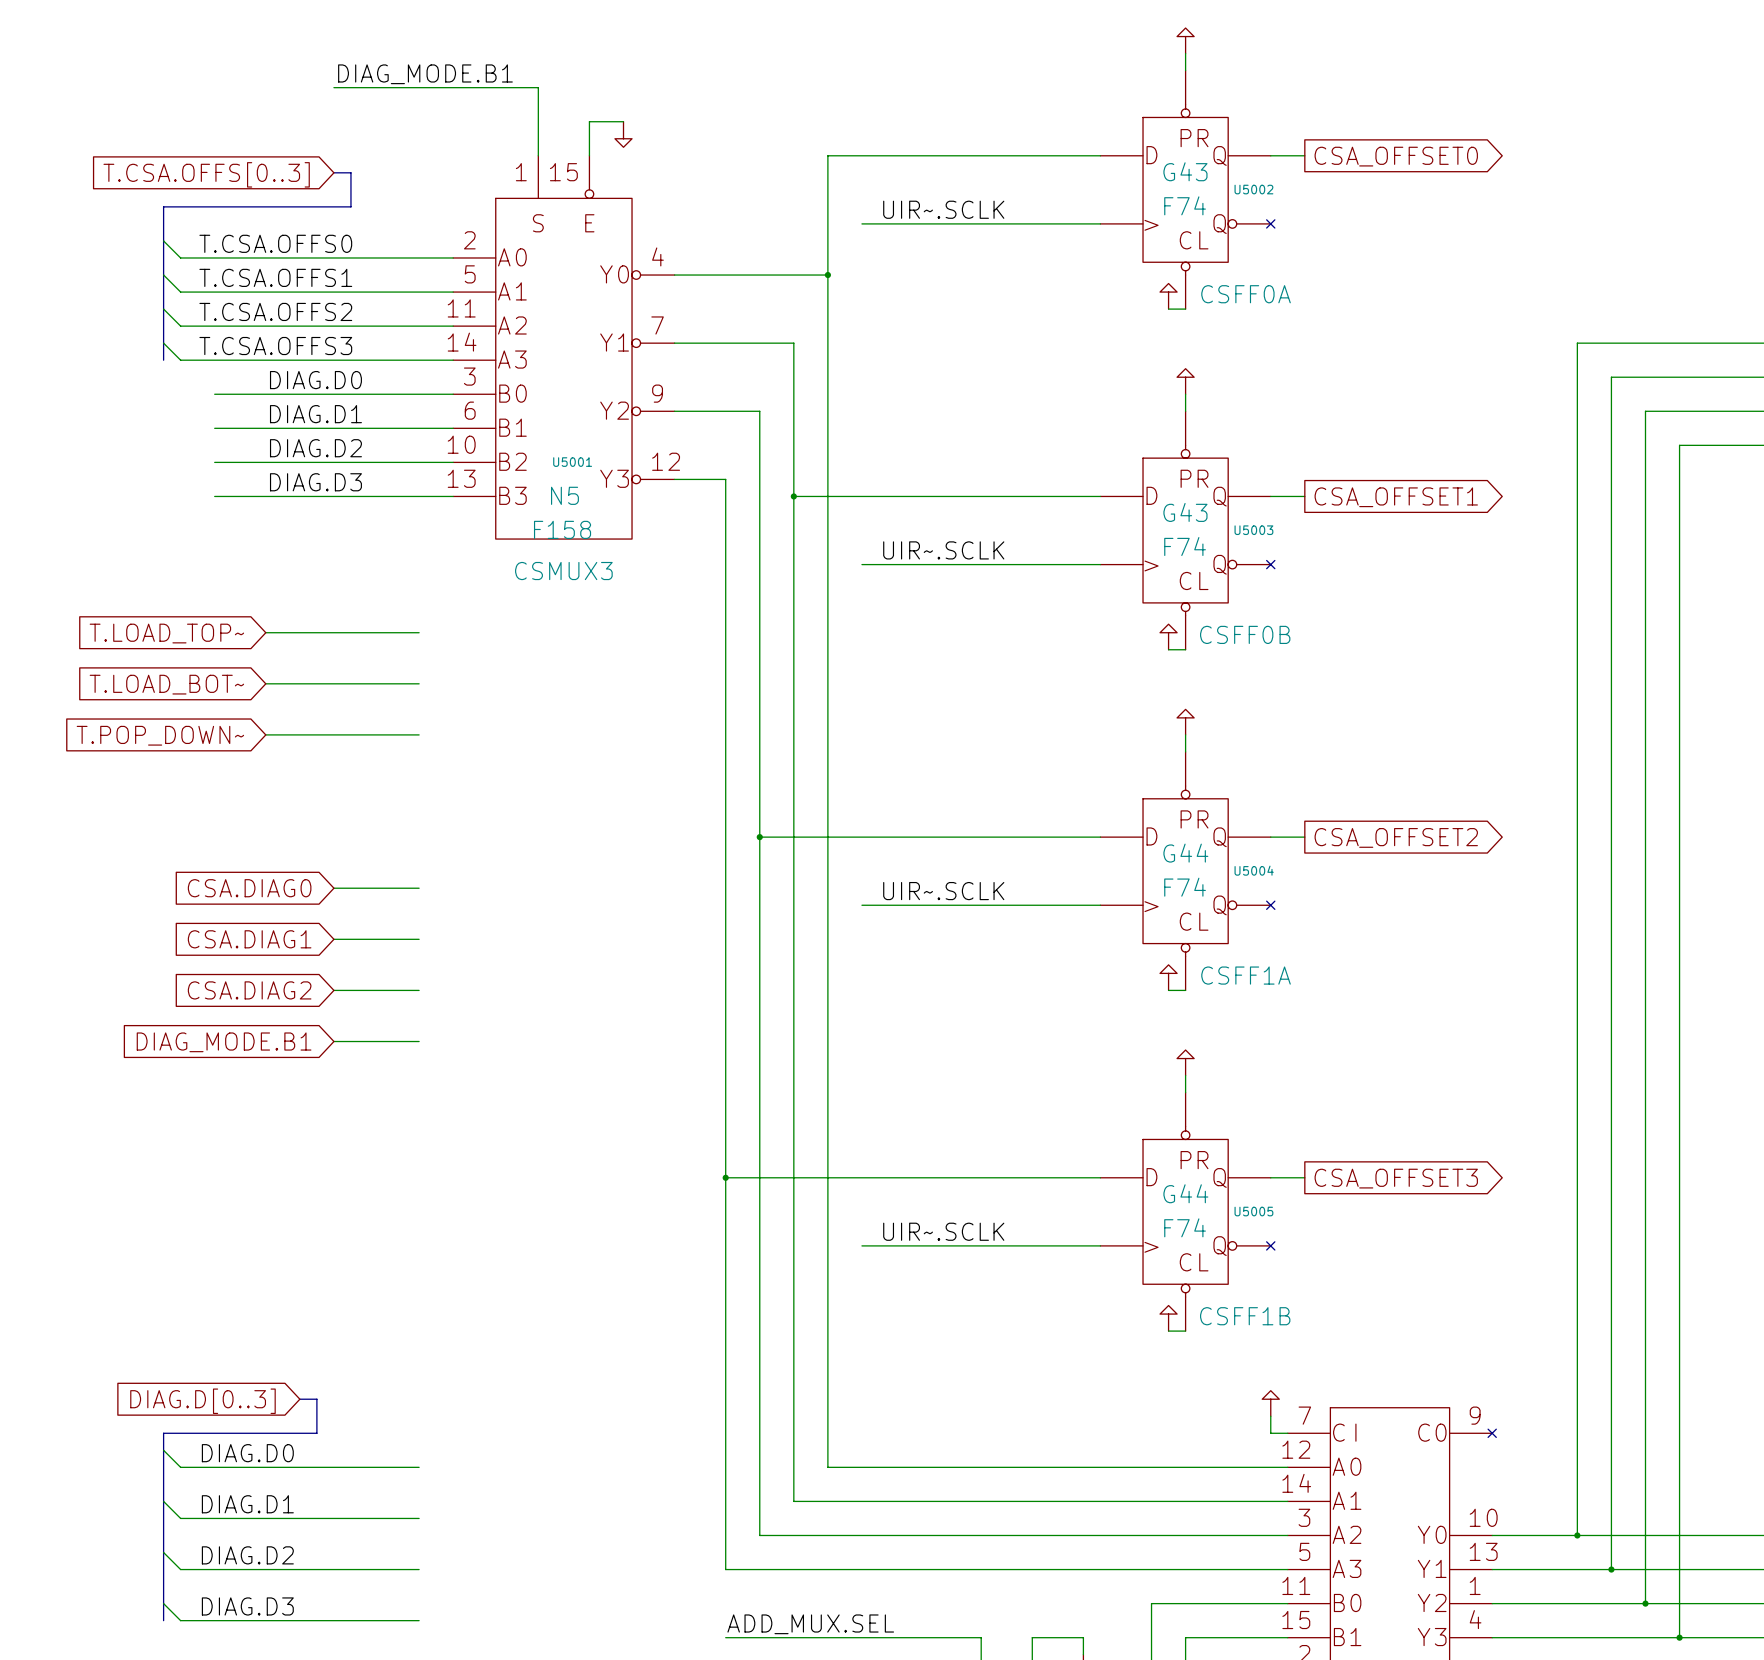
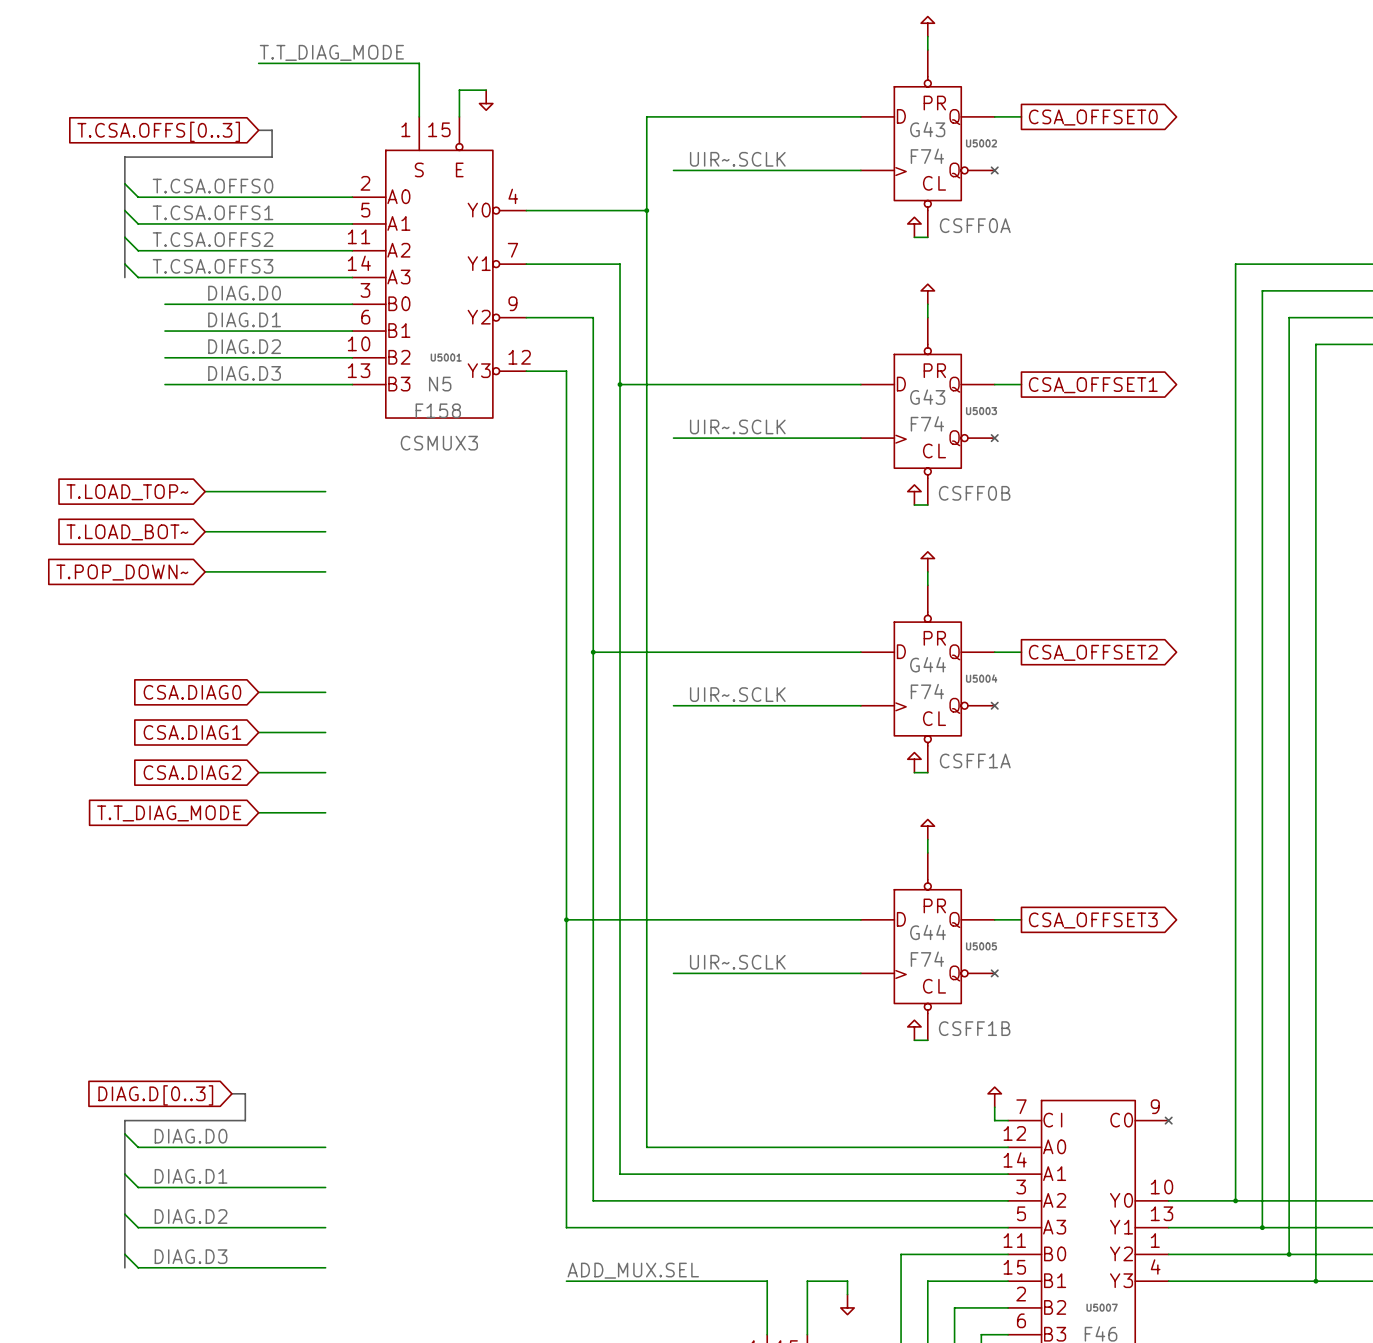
label: DIAG_MODE.B1 (425, 74) -> T.T_DIAG_MODE (331, 52)
global label: DIAG_MODE.B1 (224, 1042) -> T.T_DIAG_MODE (169, 813)

